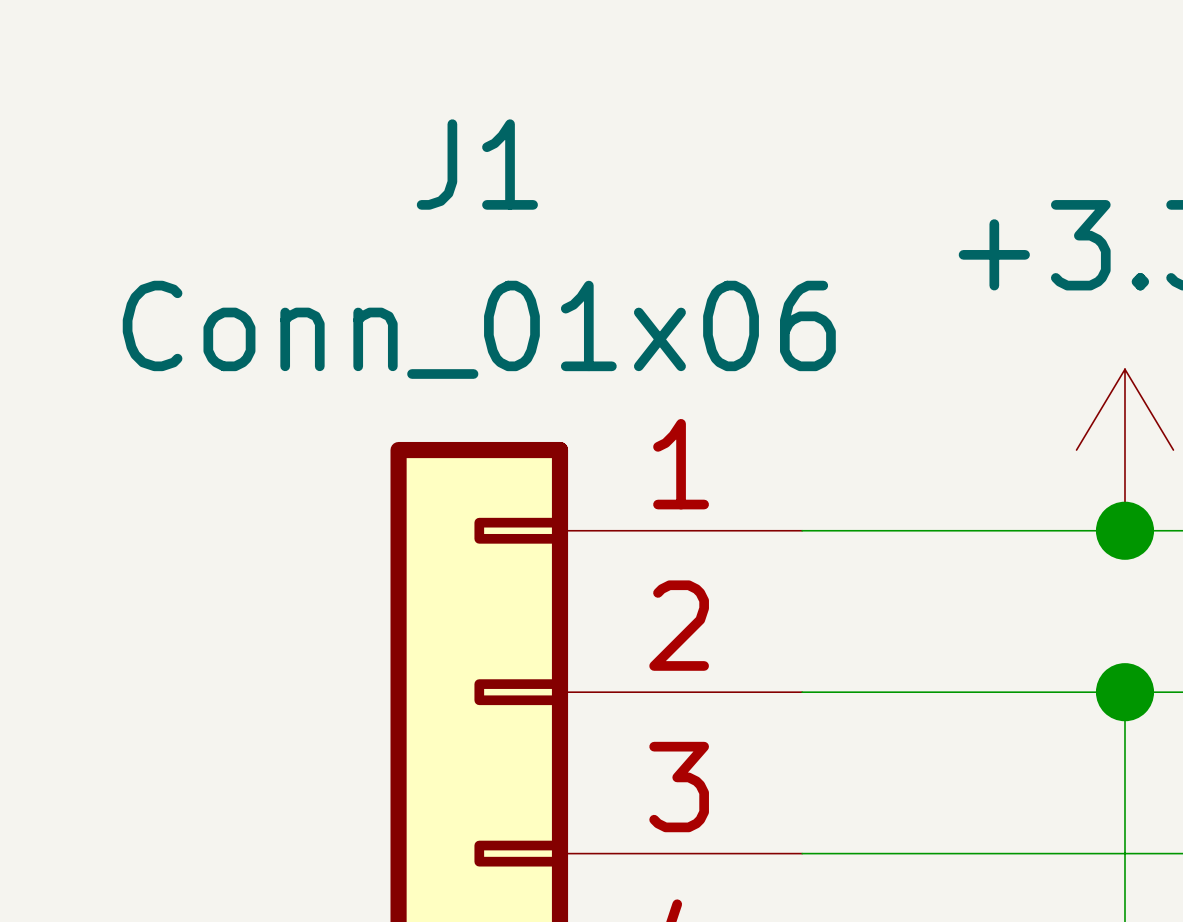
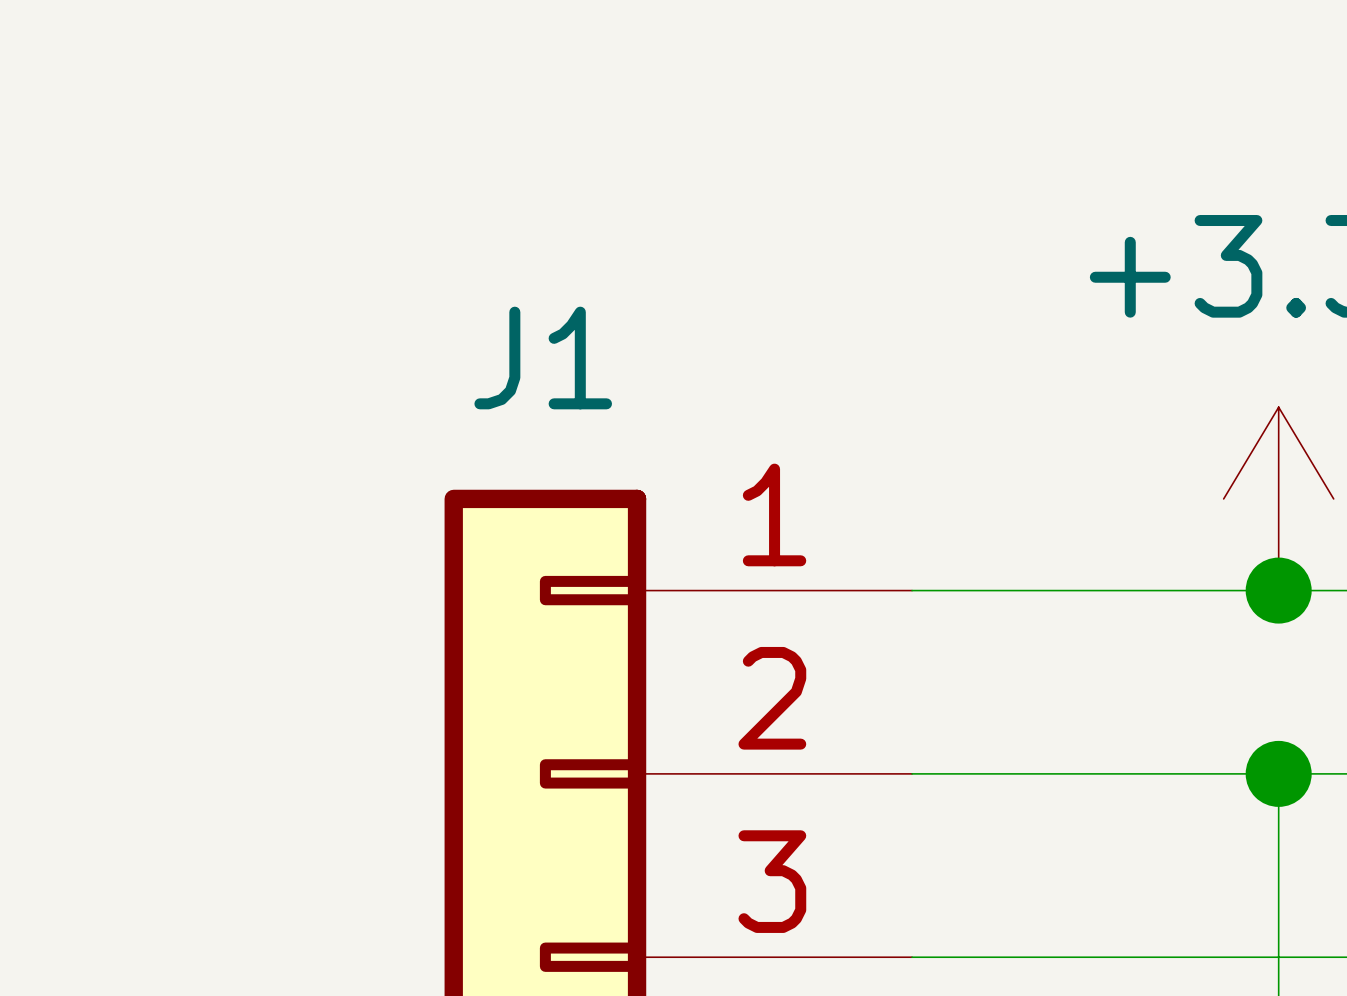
J1 name position: J1 (477, 164) -> J1 (543, 358)
J1 value: Conn_01x06 (479, 329) -> none

